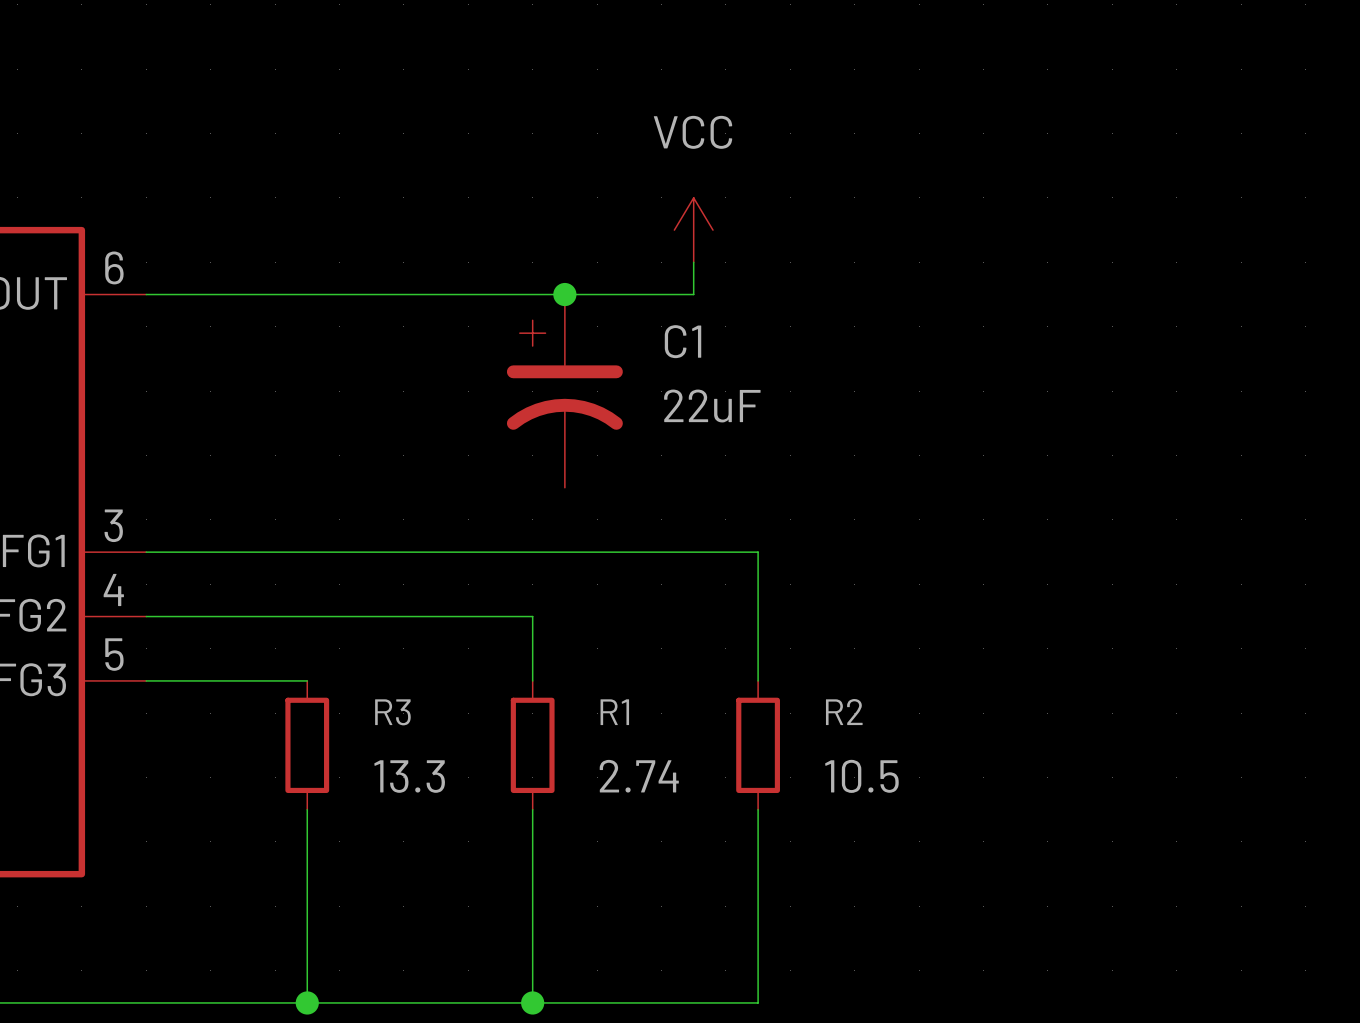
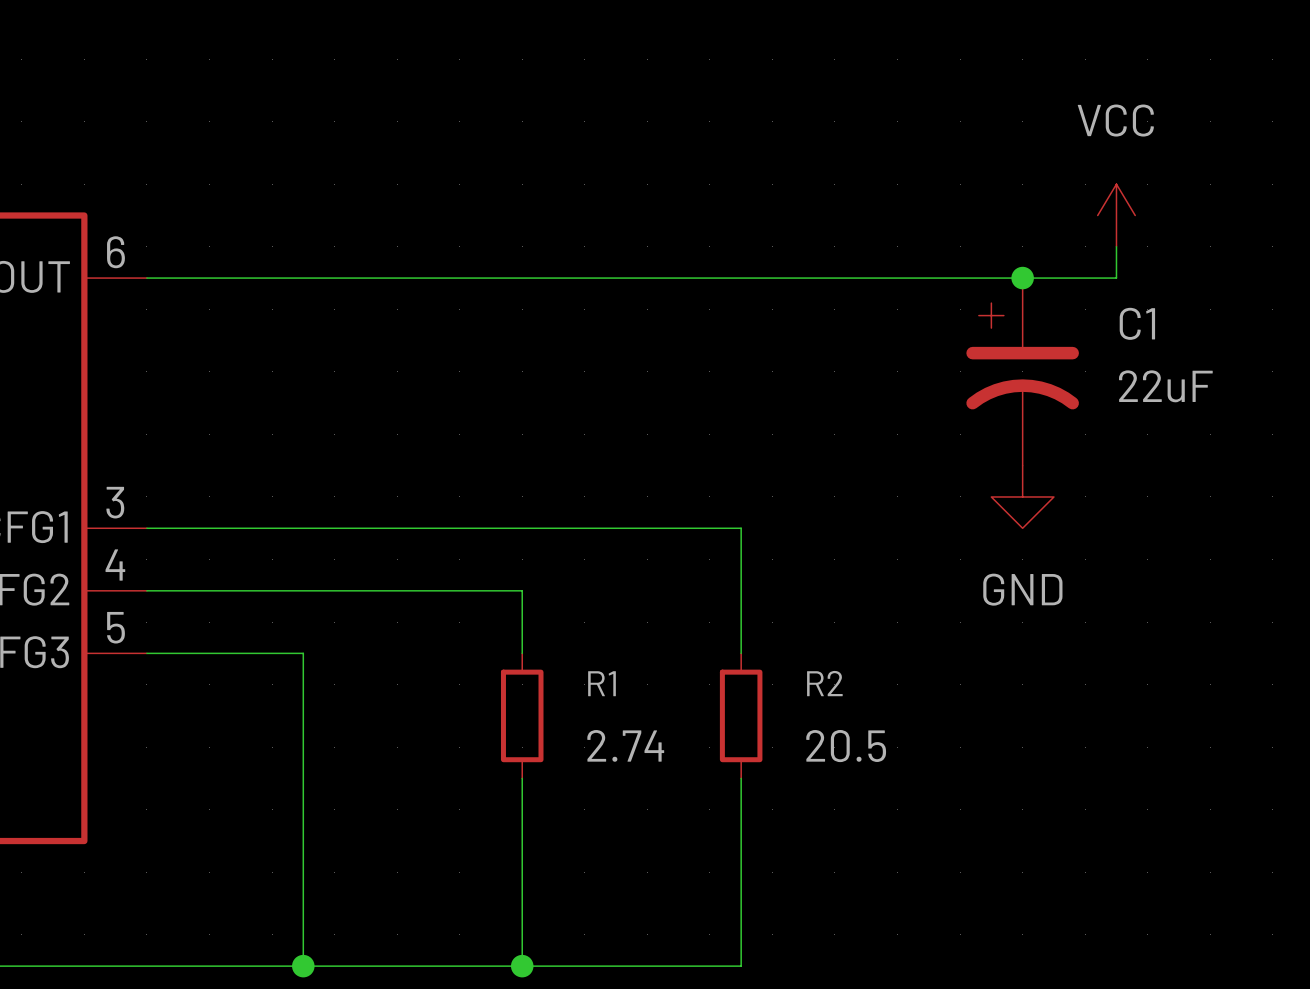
power symbol position: VCC (693, 230) -> VCC (1116, 215)
wire: (693, 262) (693, 294) -> (1116, 246) (1116, 278) (678, 278)
junction: (564, 294) -> none
junction: none -> (1022, 278)
C1 position: (564, 391) -> (1022, 371)
power symbol: none -> GND (1022, 496)
wire: none -> (303, 653) (303, 778)
R3: 13.3 (307, 745) -> none
R2 value: 10.5 (861, 776) -> 20.5 (846, 746)

